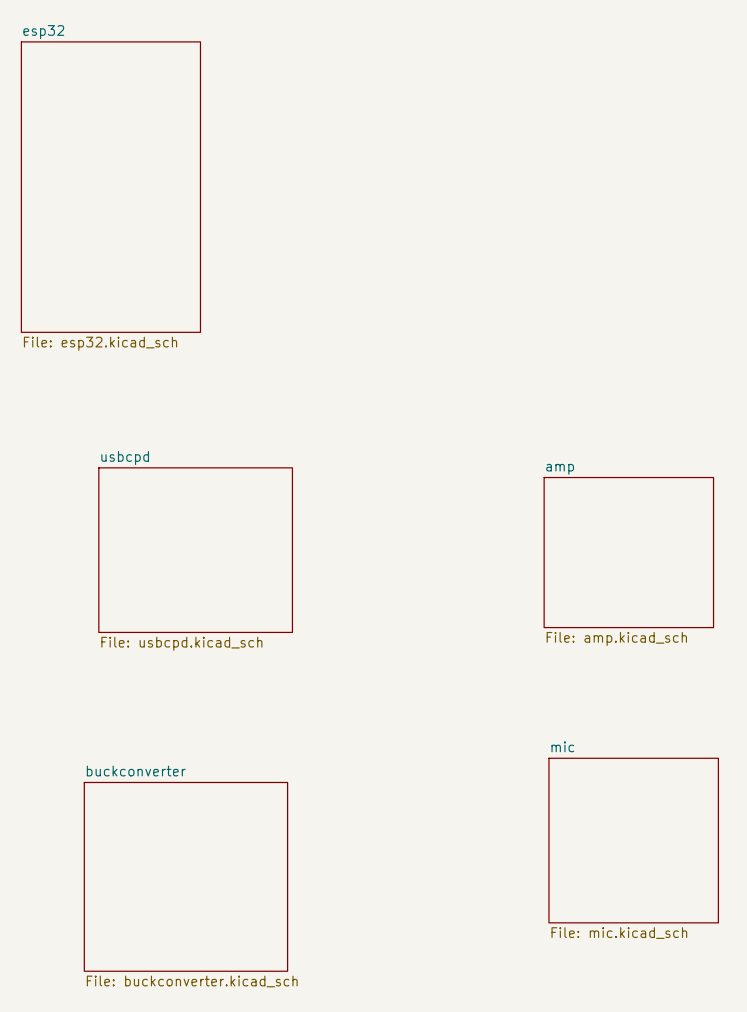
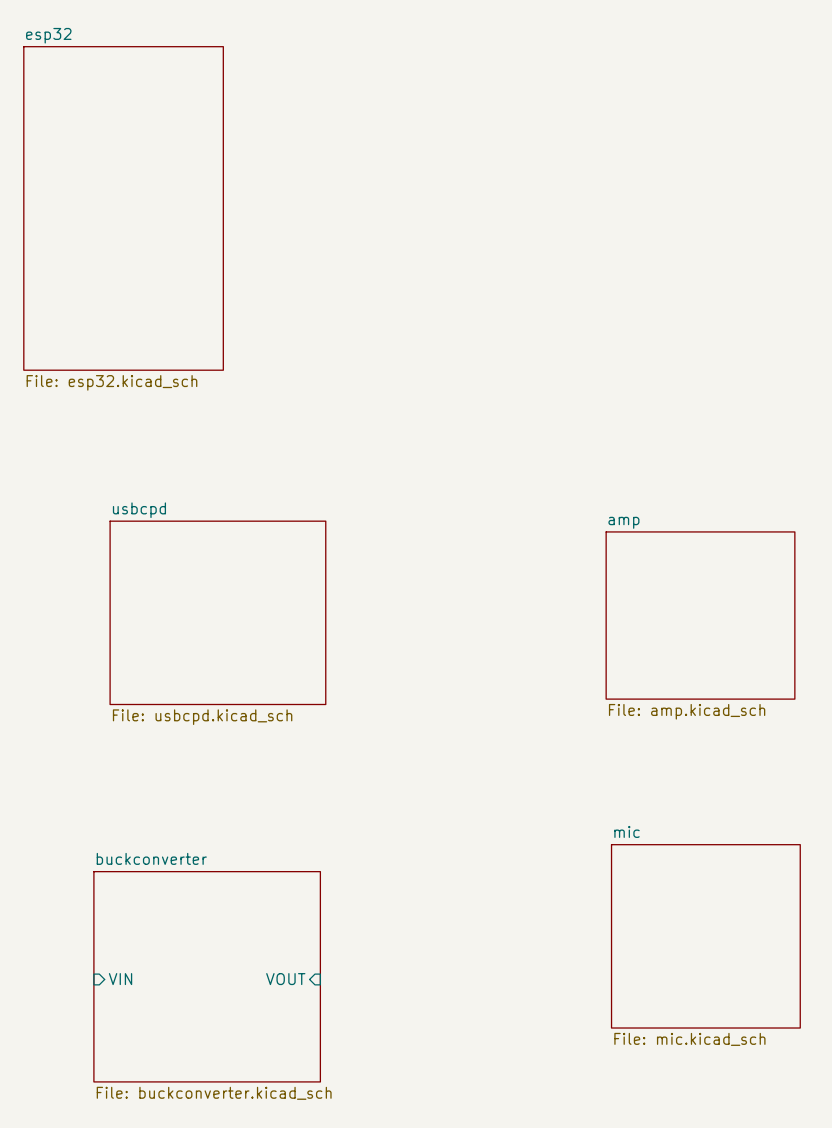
sheet pin: none -> VIN (120, 979)
sheet pin: none -> VOUT (285, 979)

